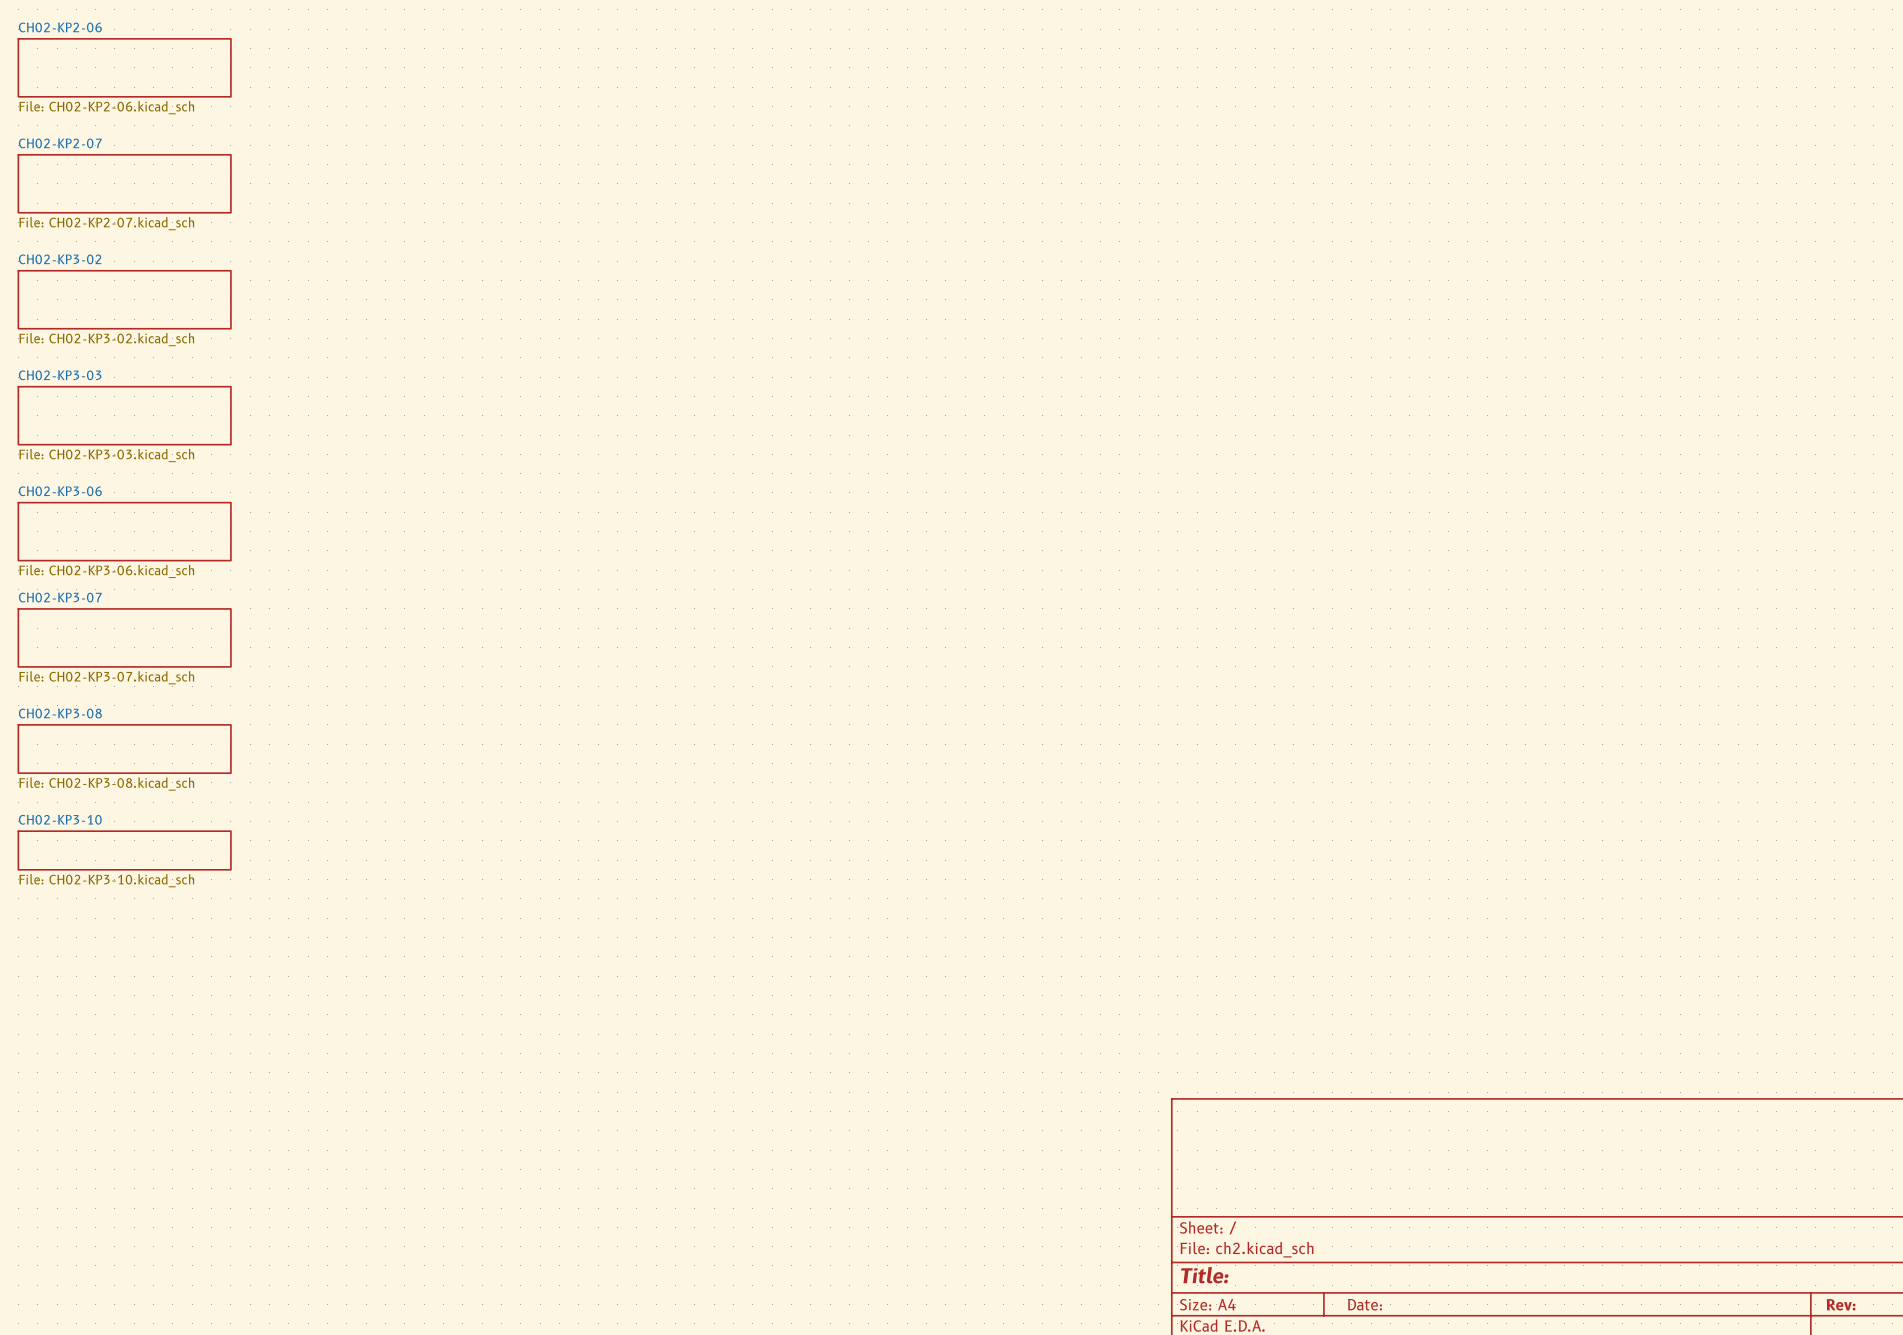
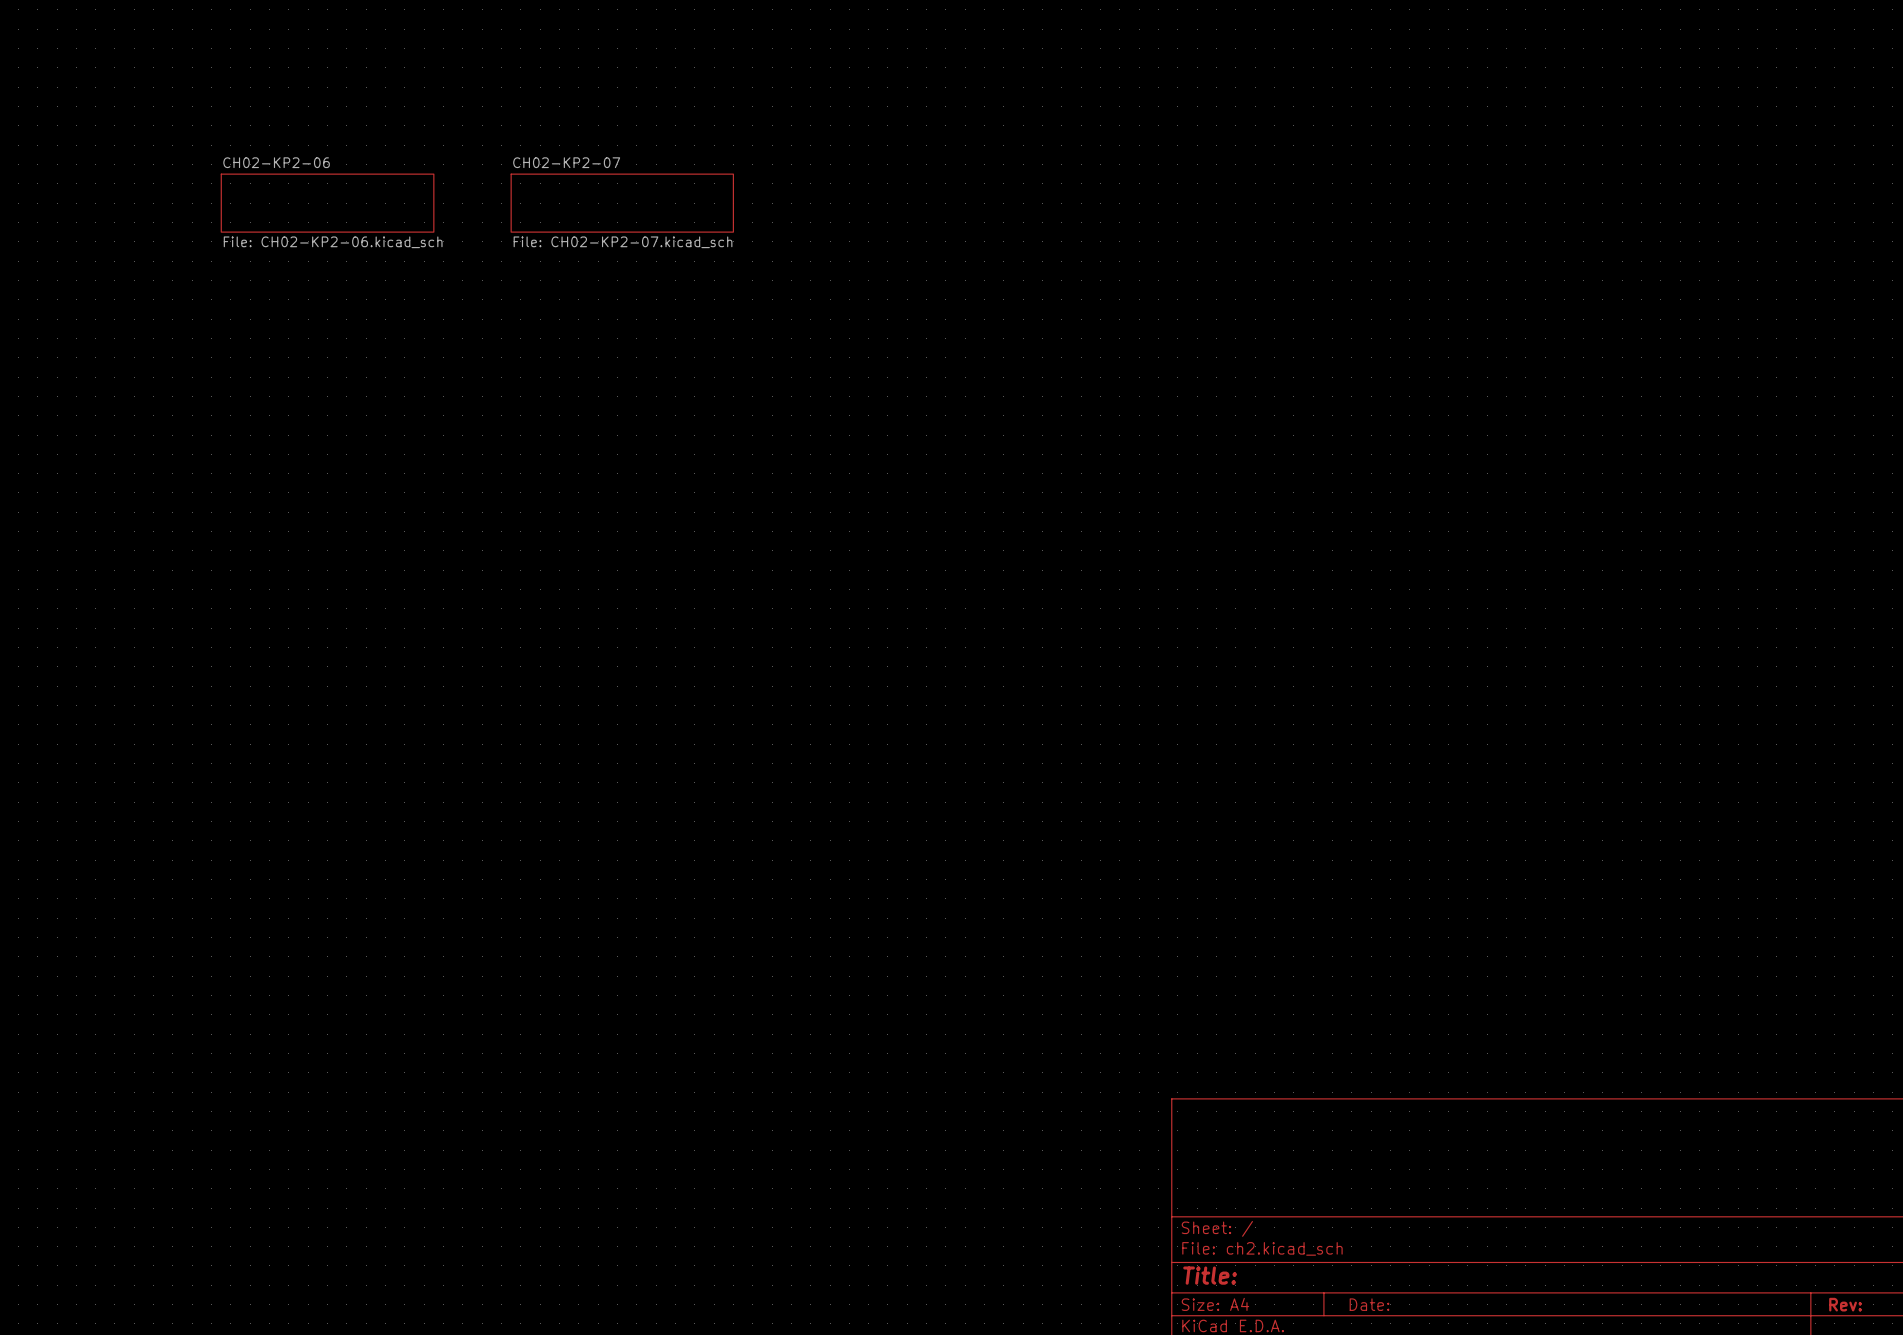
sheet CH02-KP2-06 position: (124, 67) -> (327, 203)
sheet CH02-KP2-07 shape: [17, 154, 232, 214] -> [510, 173, 734, 233]
sheet CH02-KP3-02: File: CH02-KP3-02.kicad_sch (124, 299) -> none
sheet CH02-KP3-03: File: CH02-KP3-03.kicad_sch (124, 415) -> none
sheet CH02-KP3-06: File: CH02-KP3-06.kicad_sch (124, 531) -> none
sheet CH02-KP3-07: File: CH02-KP3-07.kicad_sch (124, 637) -> none
sheet CH02-KP3-08: File: CH02-KP3-08.kicad_sch (124, 749) -> none
sheet CH02-KP3-10: File: CH02-KP3-10.kicad_sch (124, 850) -> none

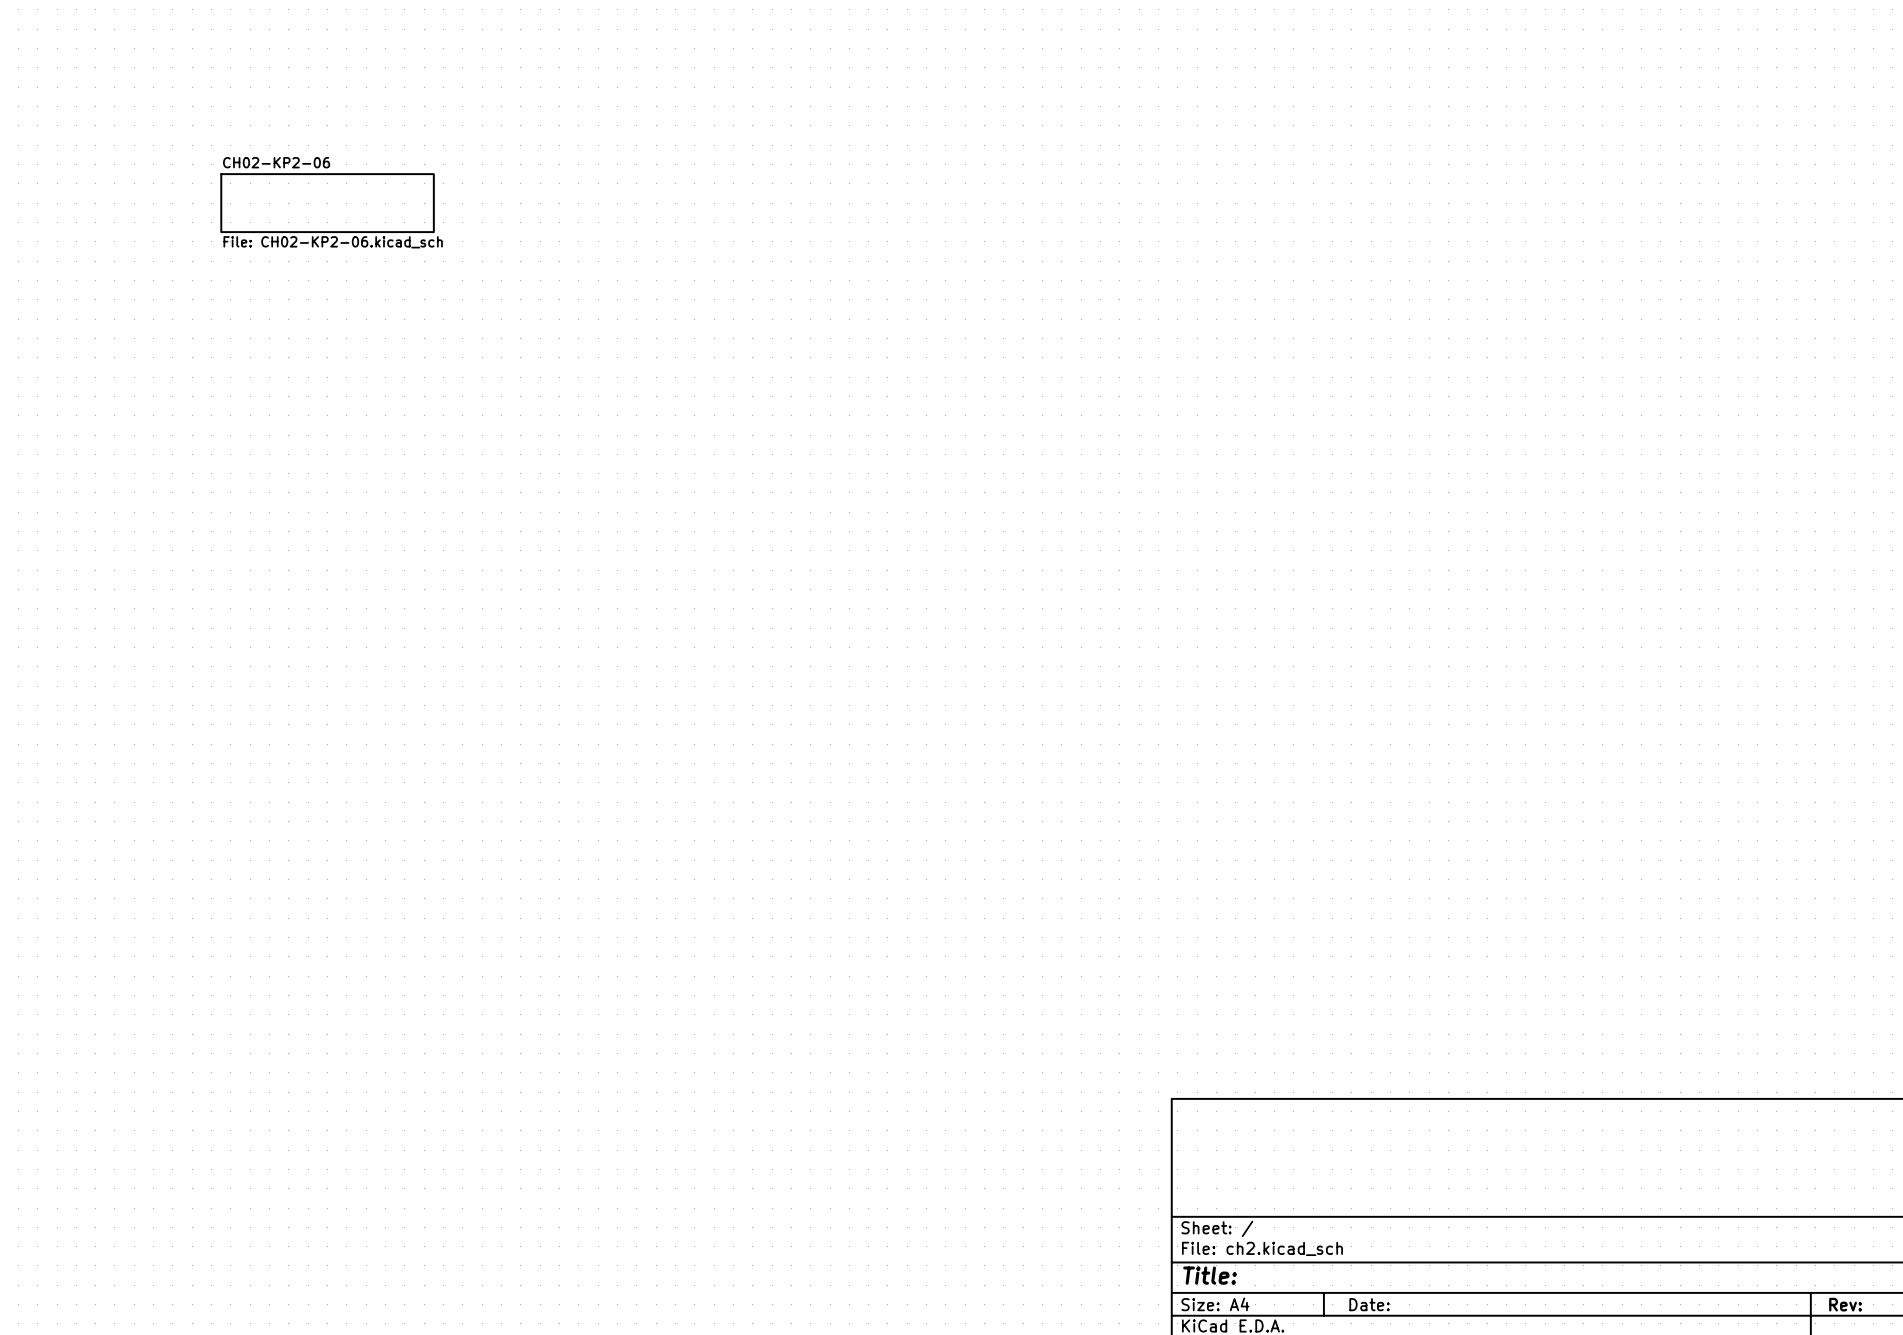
sheet CH02-KP2-07: File: CH02-KP2-07.kicad_sch (622, 203) -> none

